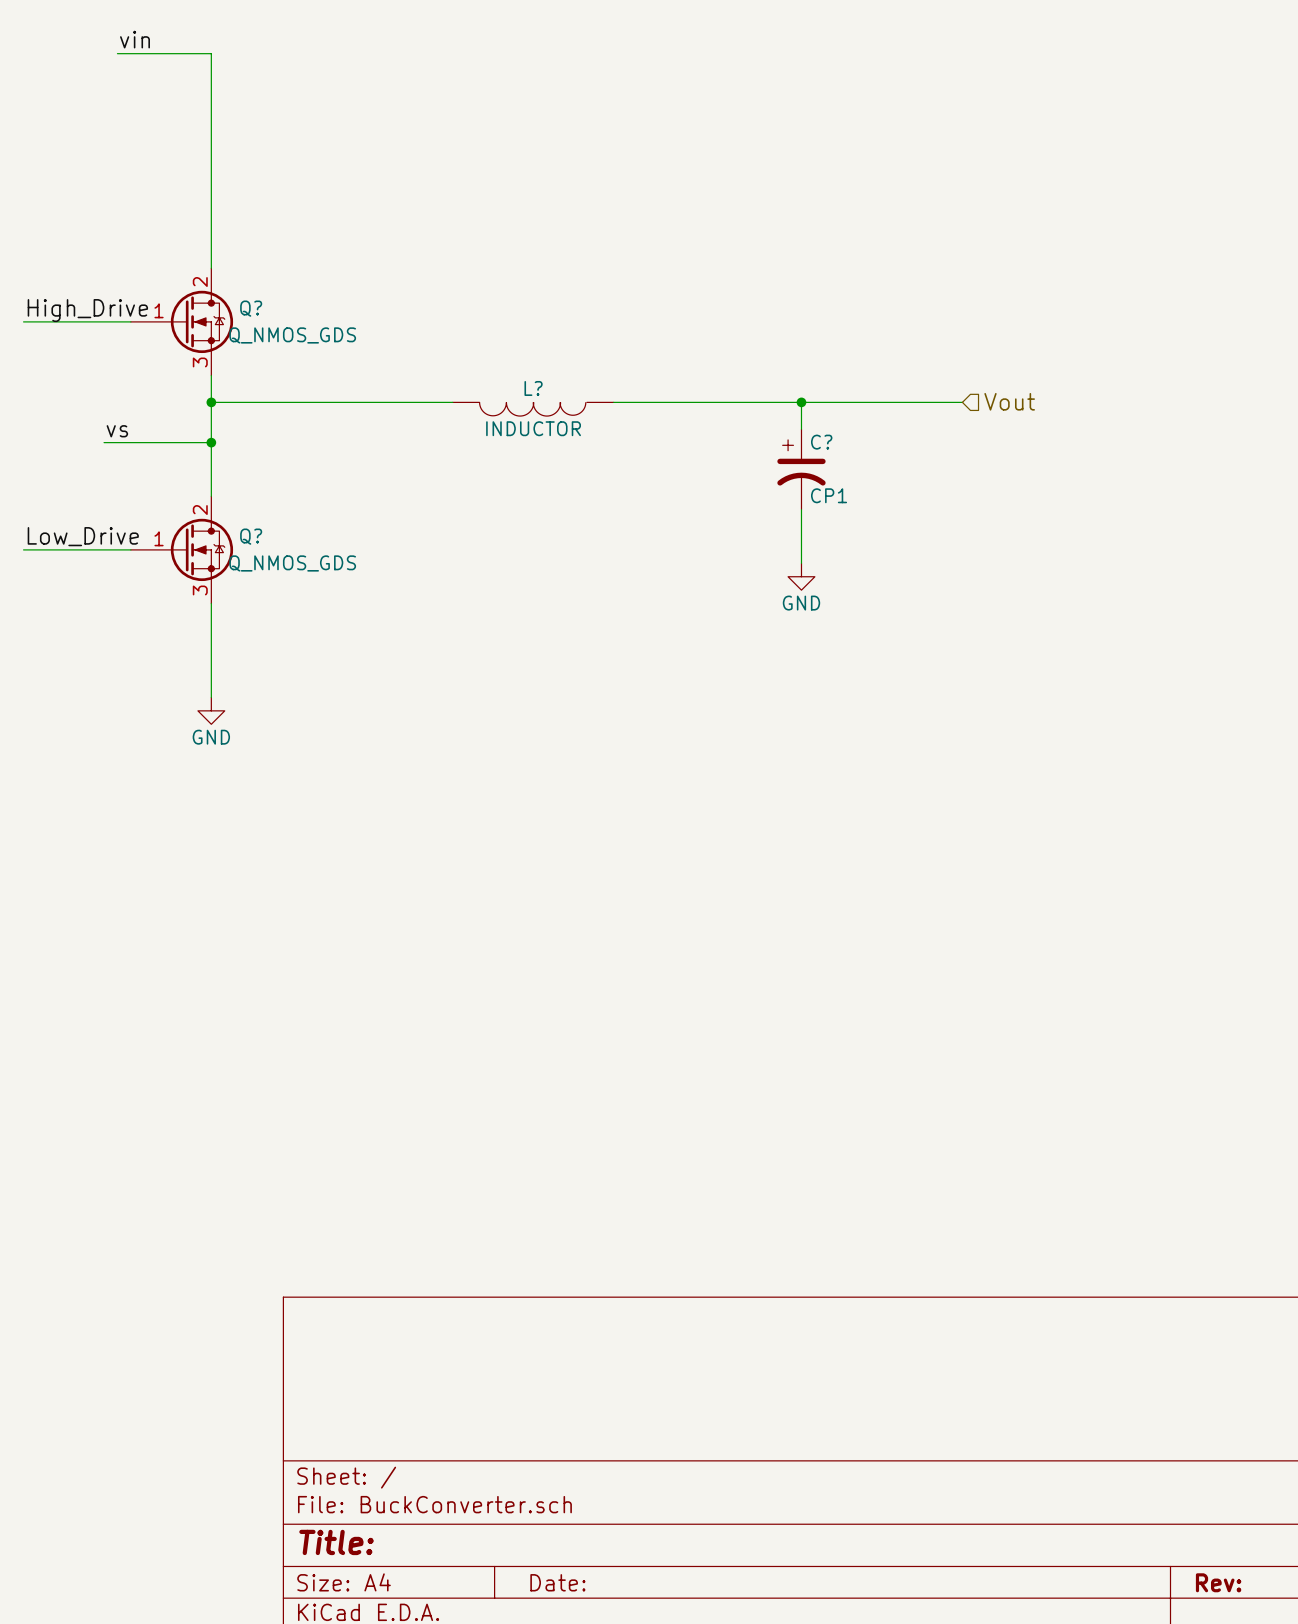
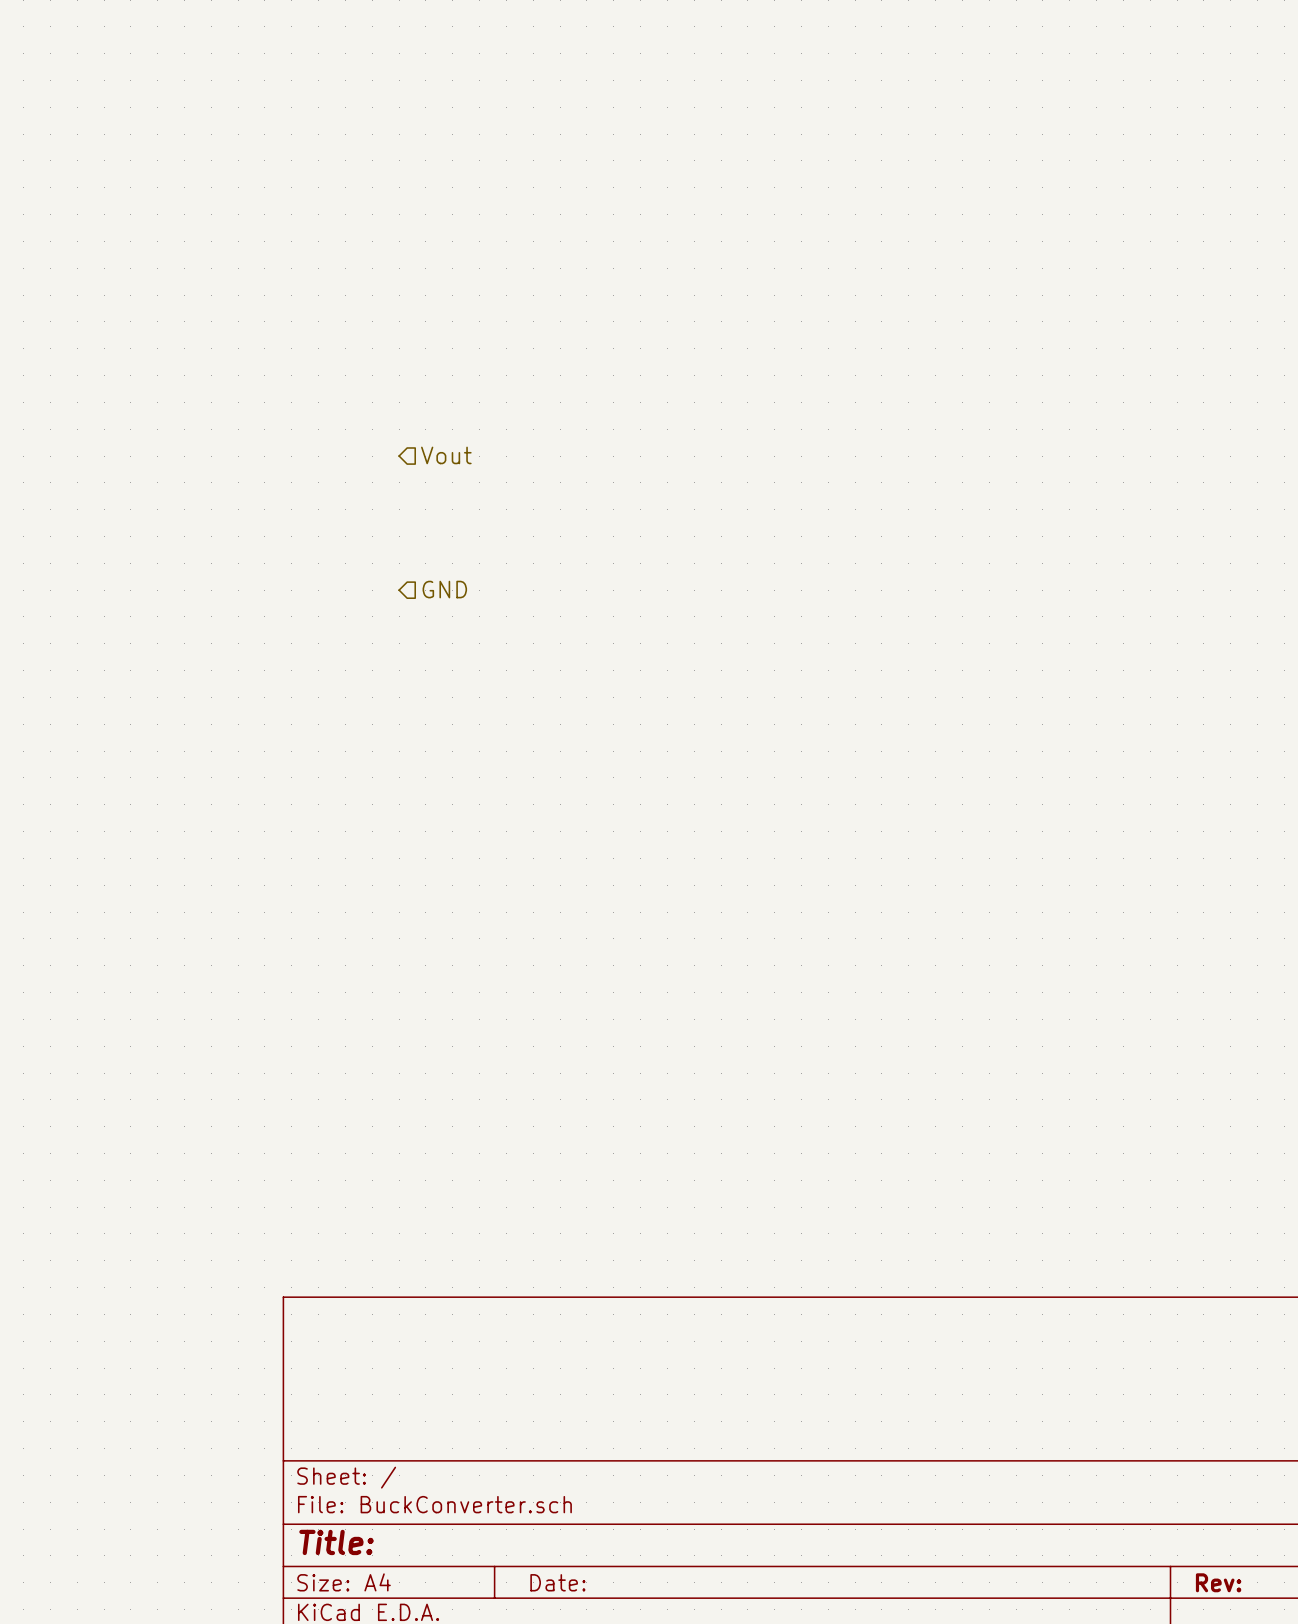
label: vin (134, 39) -> none
wire: (117, 53) (211, 53) (211, 268) -> none
label: High_Drive (87, 310) -> none
wire: (23, 321) (130, 321) -> none
Q?: Q_NMOS_GDS (181, 321) -> none
wire: (211, 375) (211, 496) -> none
hierarchical label: Vout (1009, 401) -> none
wire: (211, 402) (452, 402) -> none
junction: (211, 402) -> none
wire: (613, 402) (962, 402) -> none
wire: (801, 402) (801, 429) -> none
junction: (801, 402) -> none
L?: INDUCTOR (533, 409) -> none
label: vs (117, 431) -> none
wire: (104, 442) (211, 442) -> none
junction: (211, 442) -> none
hierarchical label: none -> Vout (446, 455)
C?: CP1 (801, 469) -> none
wire: (801, 509) (801, 563) -> none
label: Low_Drive (83, 536) -> none
wire: (23, 549) (130, 549) -> none
Q?: Q_NMOS_GDS (181, 549) -> none
power symbol: GND (801, 576) -> none
hierarchical label: none -> GND (444, 589)
wire: (211, 603) (211, 697) -> none
power symbol: GND (211, 710) -> none

